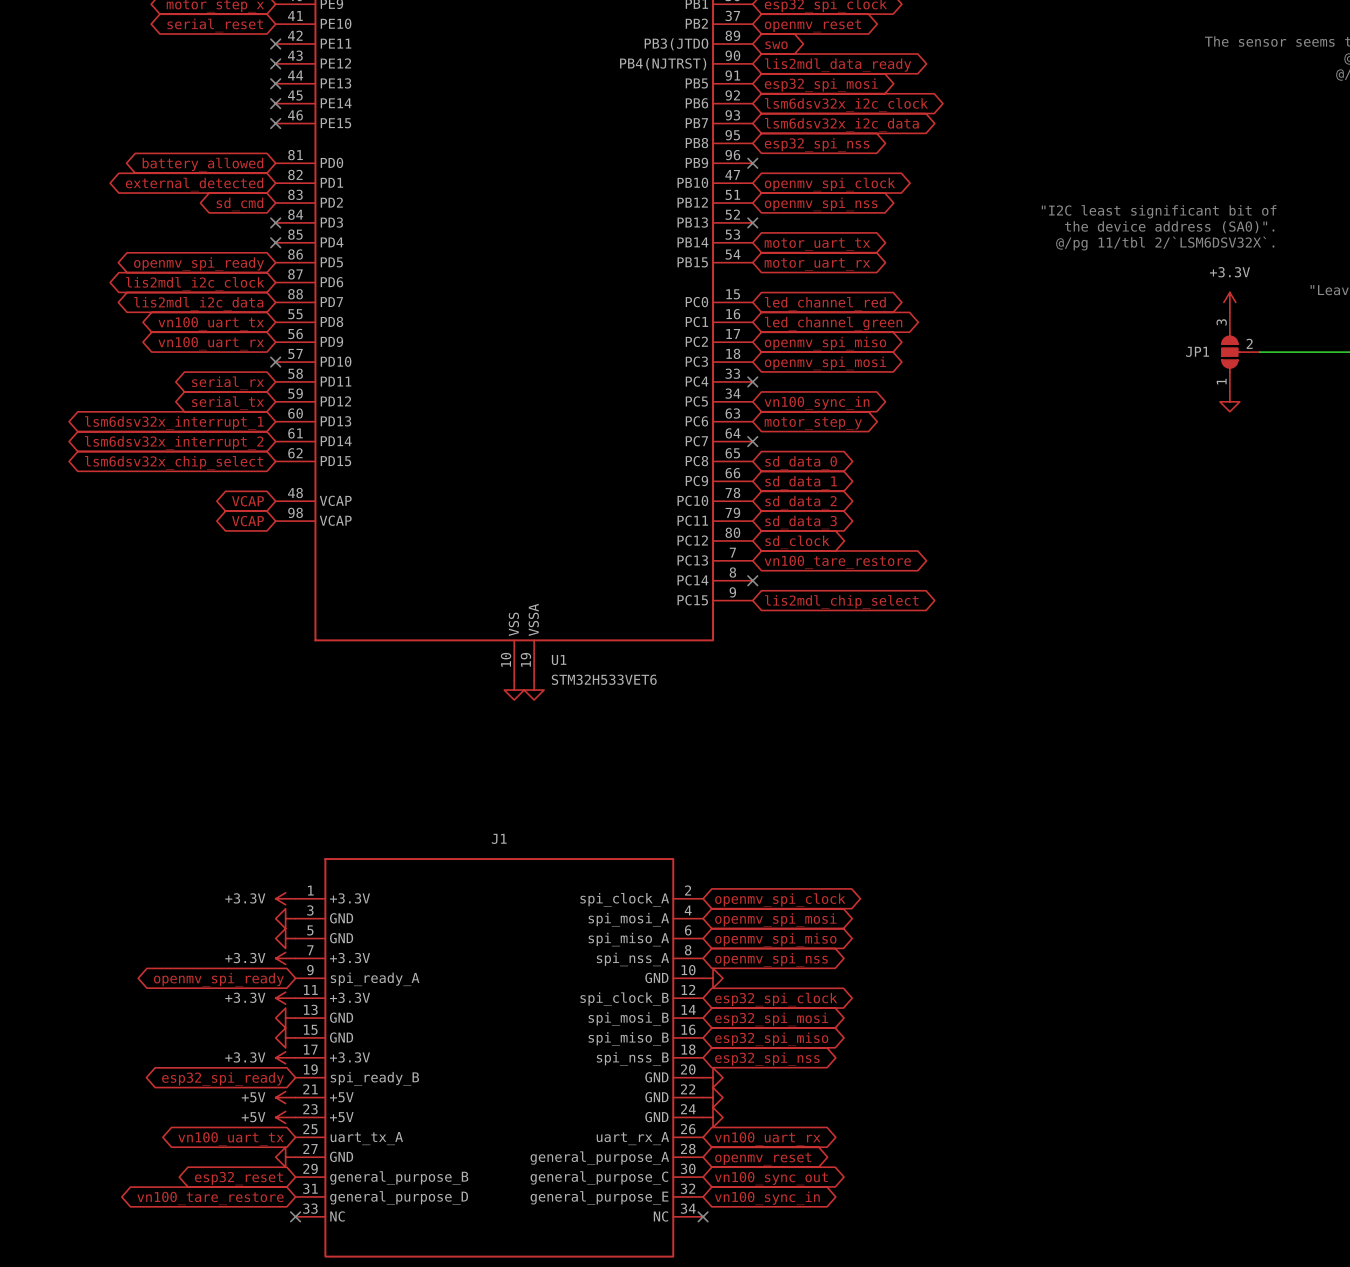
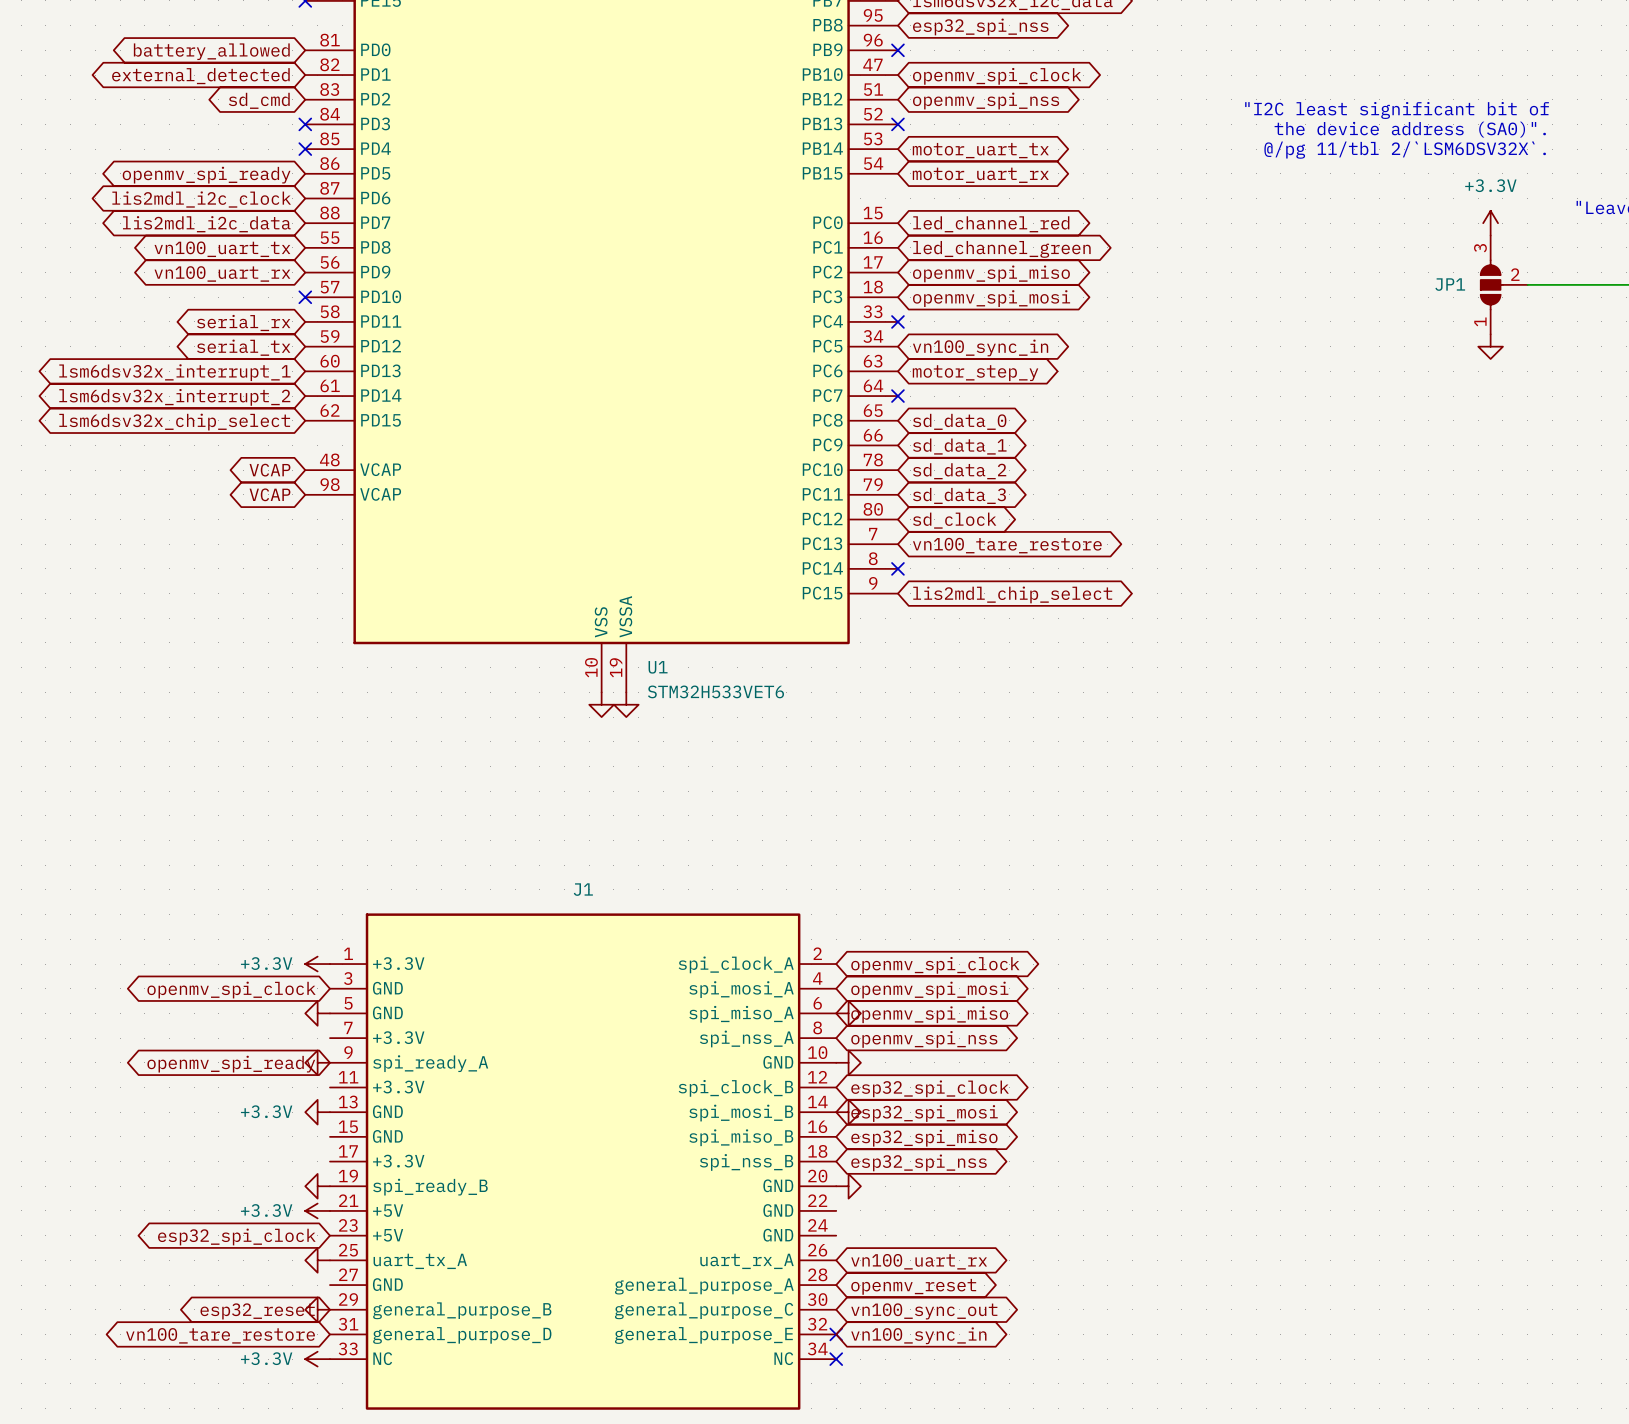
power symbol: (285, 918) -> none
global label: none -> openmv_spi_clock (231, 990)
power symbol: none -> (848, 1013)
power symbol: +3.3V (285, 958) -> none
power symbol: none -> (317, 1062)
power symbol: +3.3V (285, 998) -> none
power symbol text: none -> +3.3V (266, 1111)
power symbol: none -> (848, 1112)
power symbol: (285, 1037) -> none
power symbol: +3.3V (285, 1057) -> none
power symbol: none -> (317, 1186)
global label: esp32_spi_ready (222, 1079) -> none
power symbol: +5V (285, 1097) -> +3.3V (317, 1210)
power symbol: (713, 1097) -> none
power symbol: +5V (285, 1117) -> none
power symbol: (713, 1117) -> none
global label: none -> esp32_spi_clock (236, 1236)
power symbol: none -> (317, 1260)
global label: vn100_uart_tx (231, 1138) -> none
power symbol: (285, 1157) -> none
power symbol: none -> (317, 1309)
no-connect mark: none -> (836, 1334)
power symbol: none -> +3.3V (317, 1359)
no-connect mark: (295, 1216) -> none

